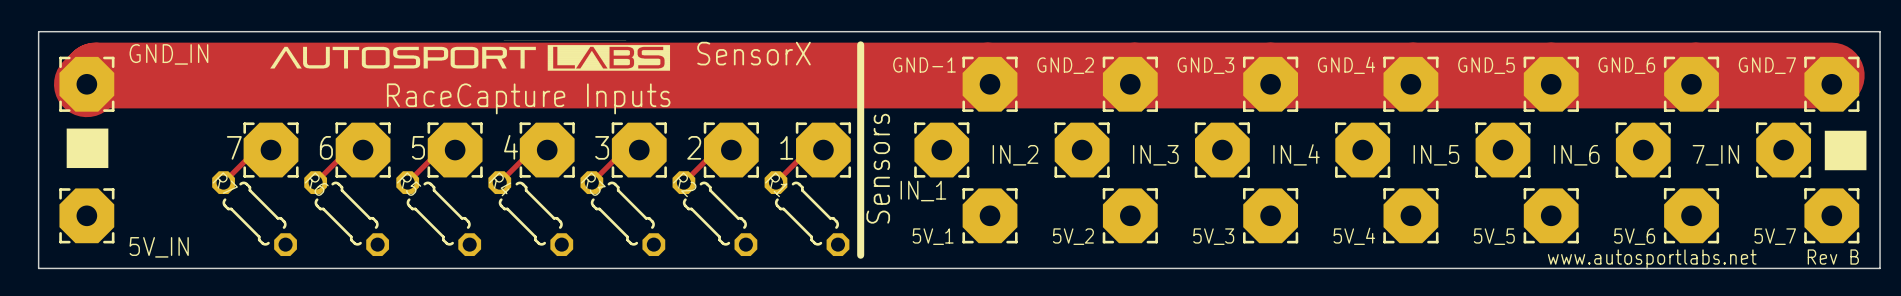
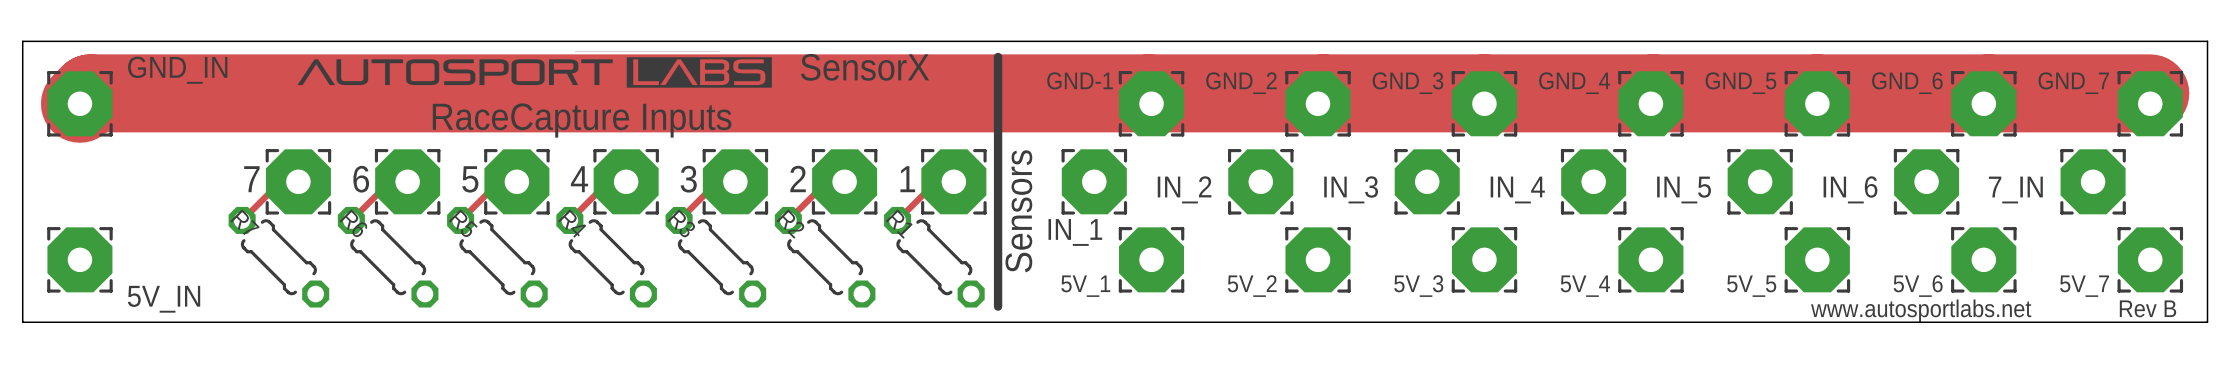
drawing: [66, 128, 109, 169] -> none
drawing: [1824, 130, 1867, 171] -> none

